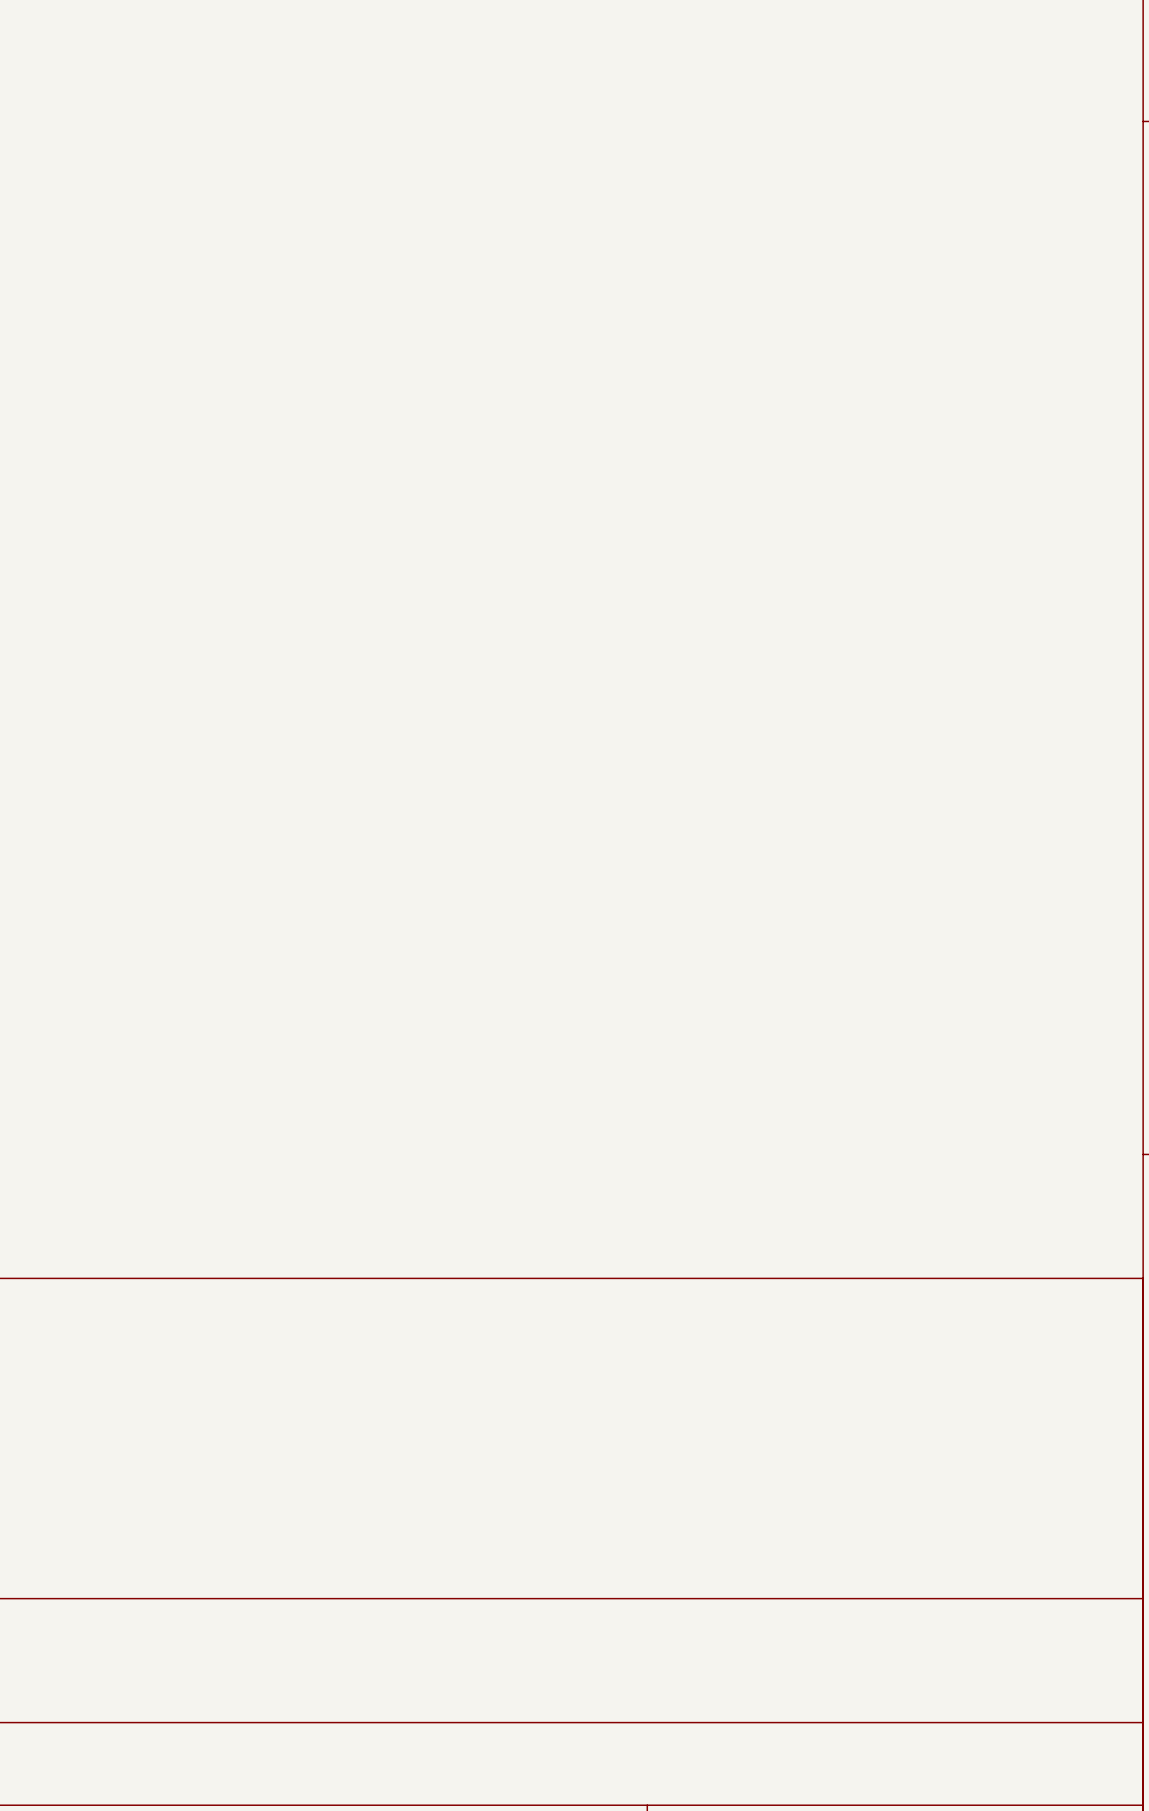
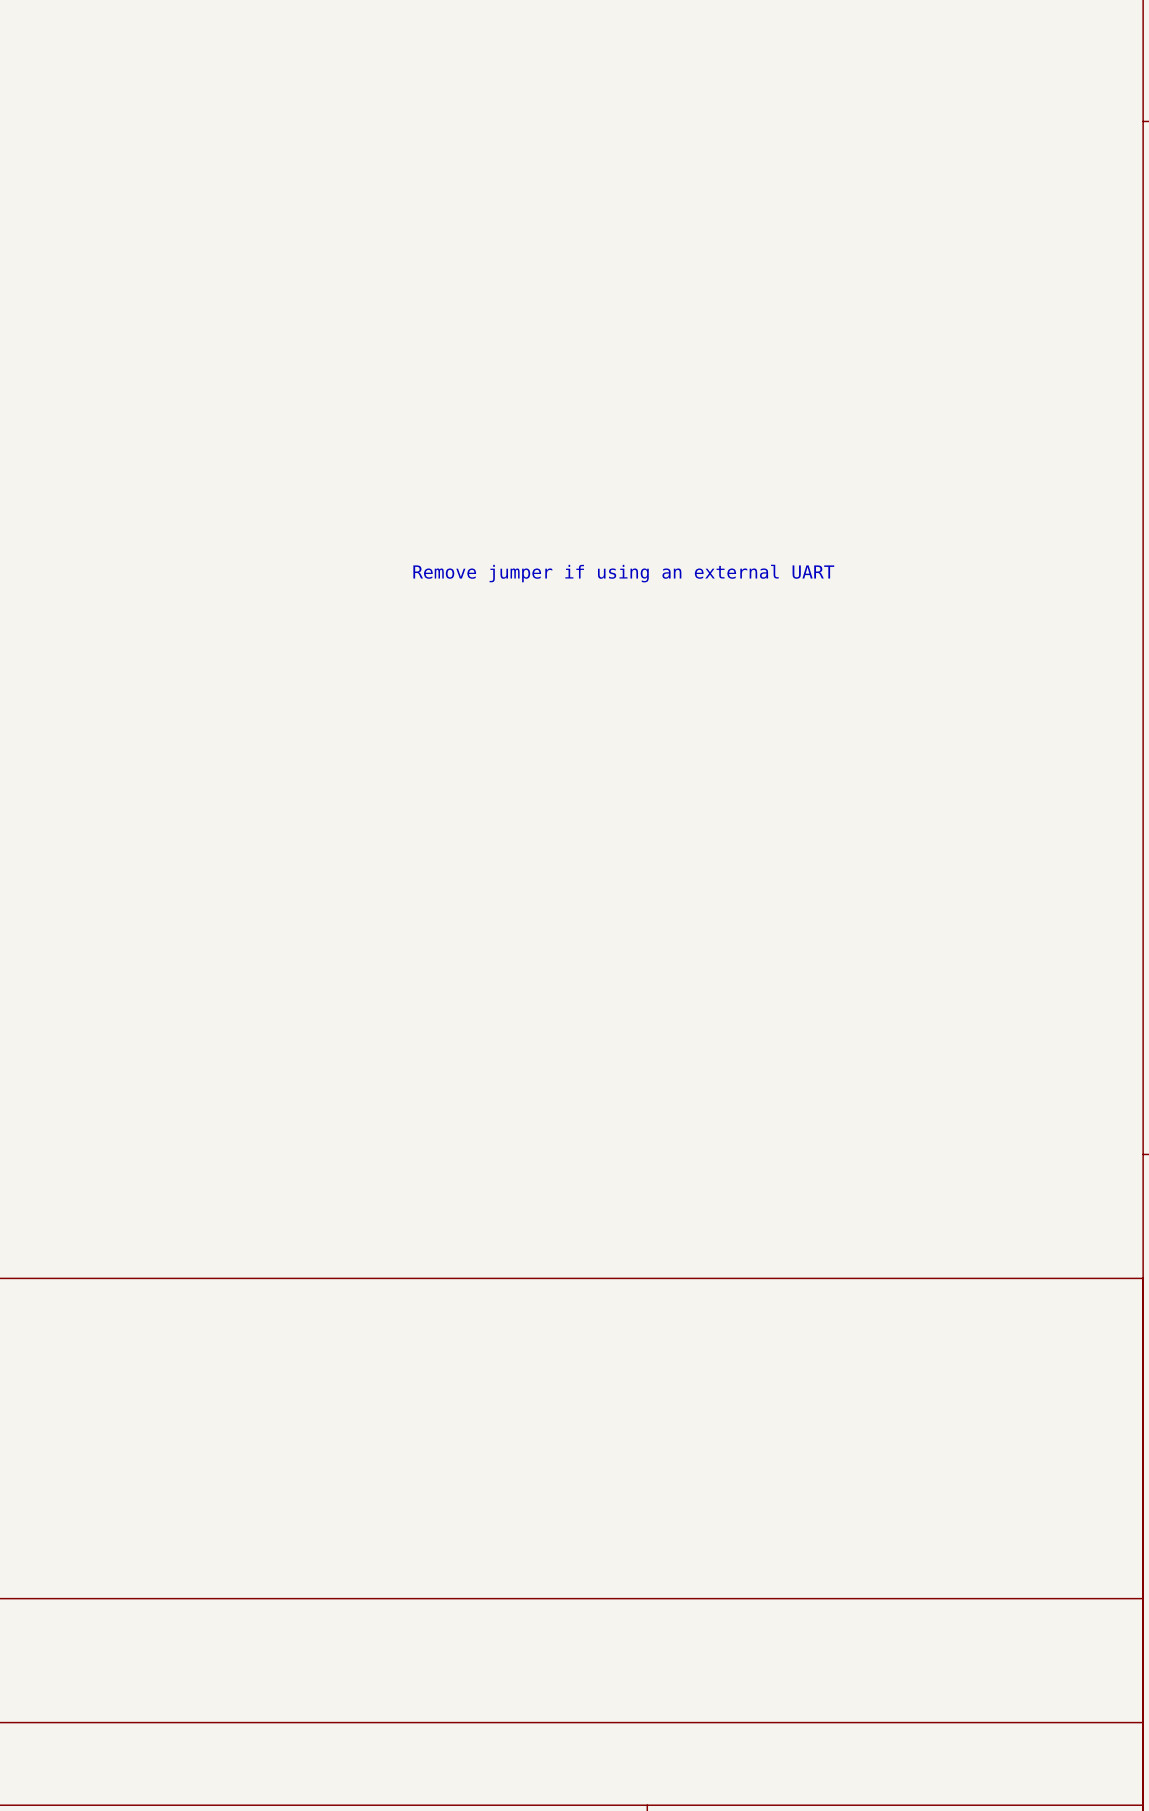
text: none -> Remove jumper if using an external UART (623, 573)

